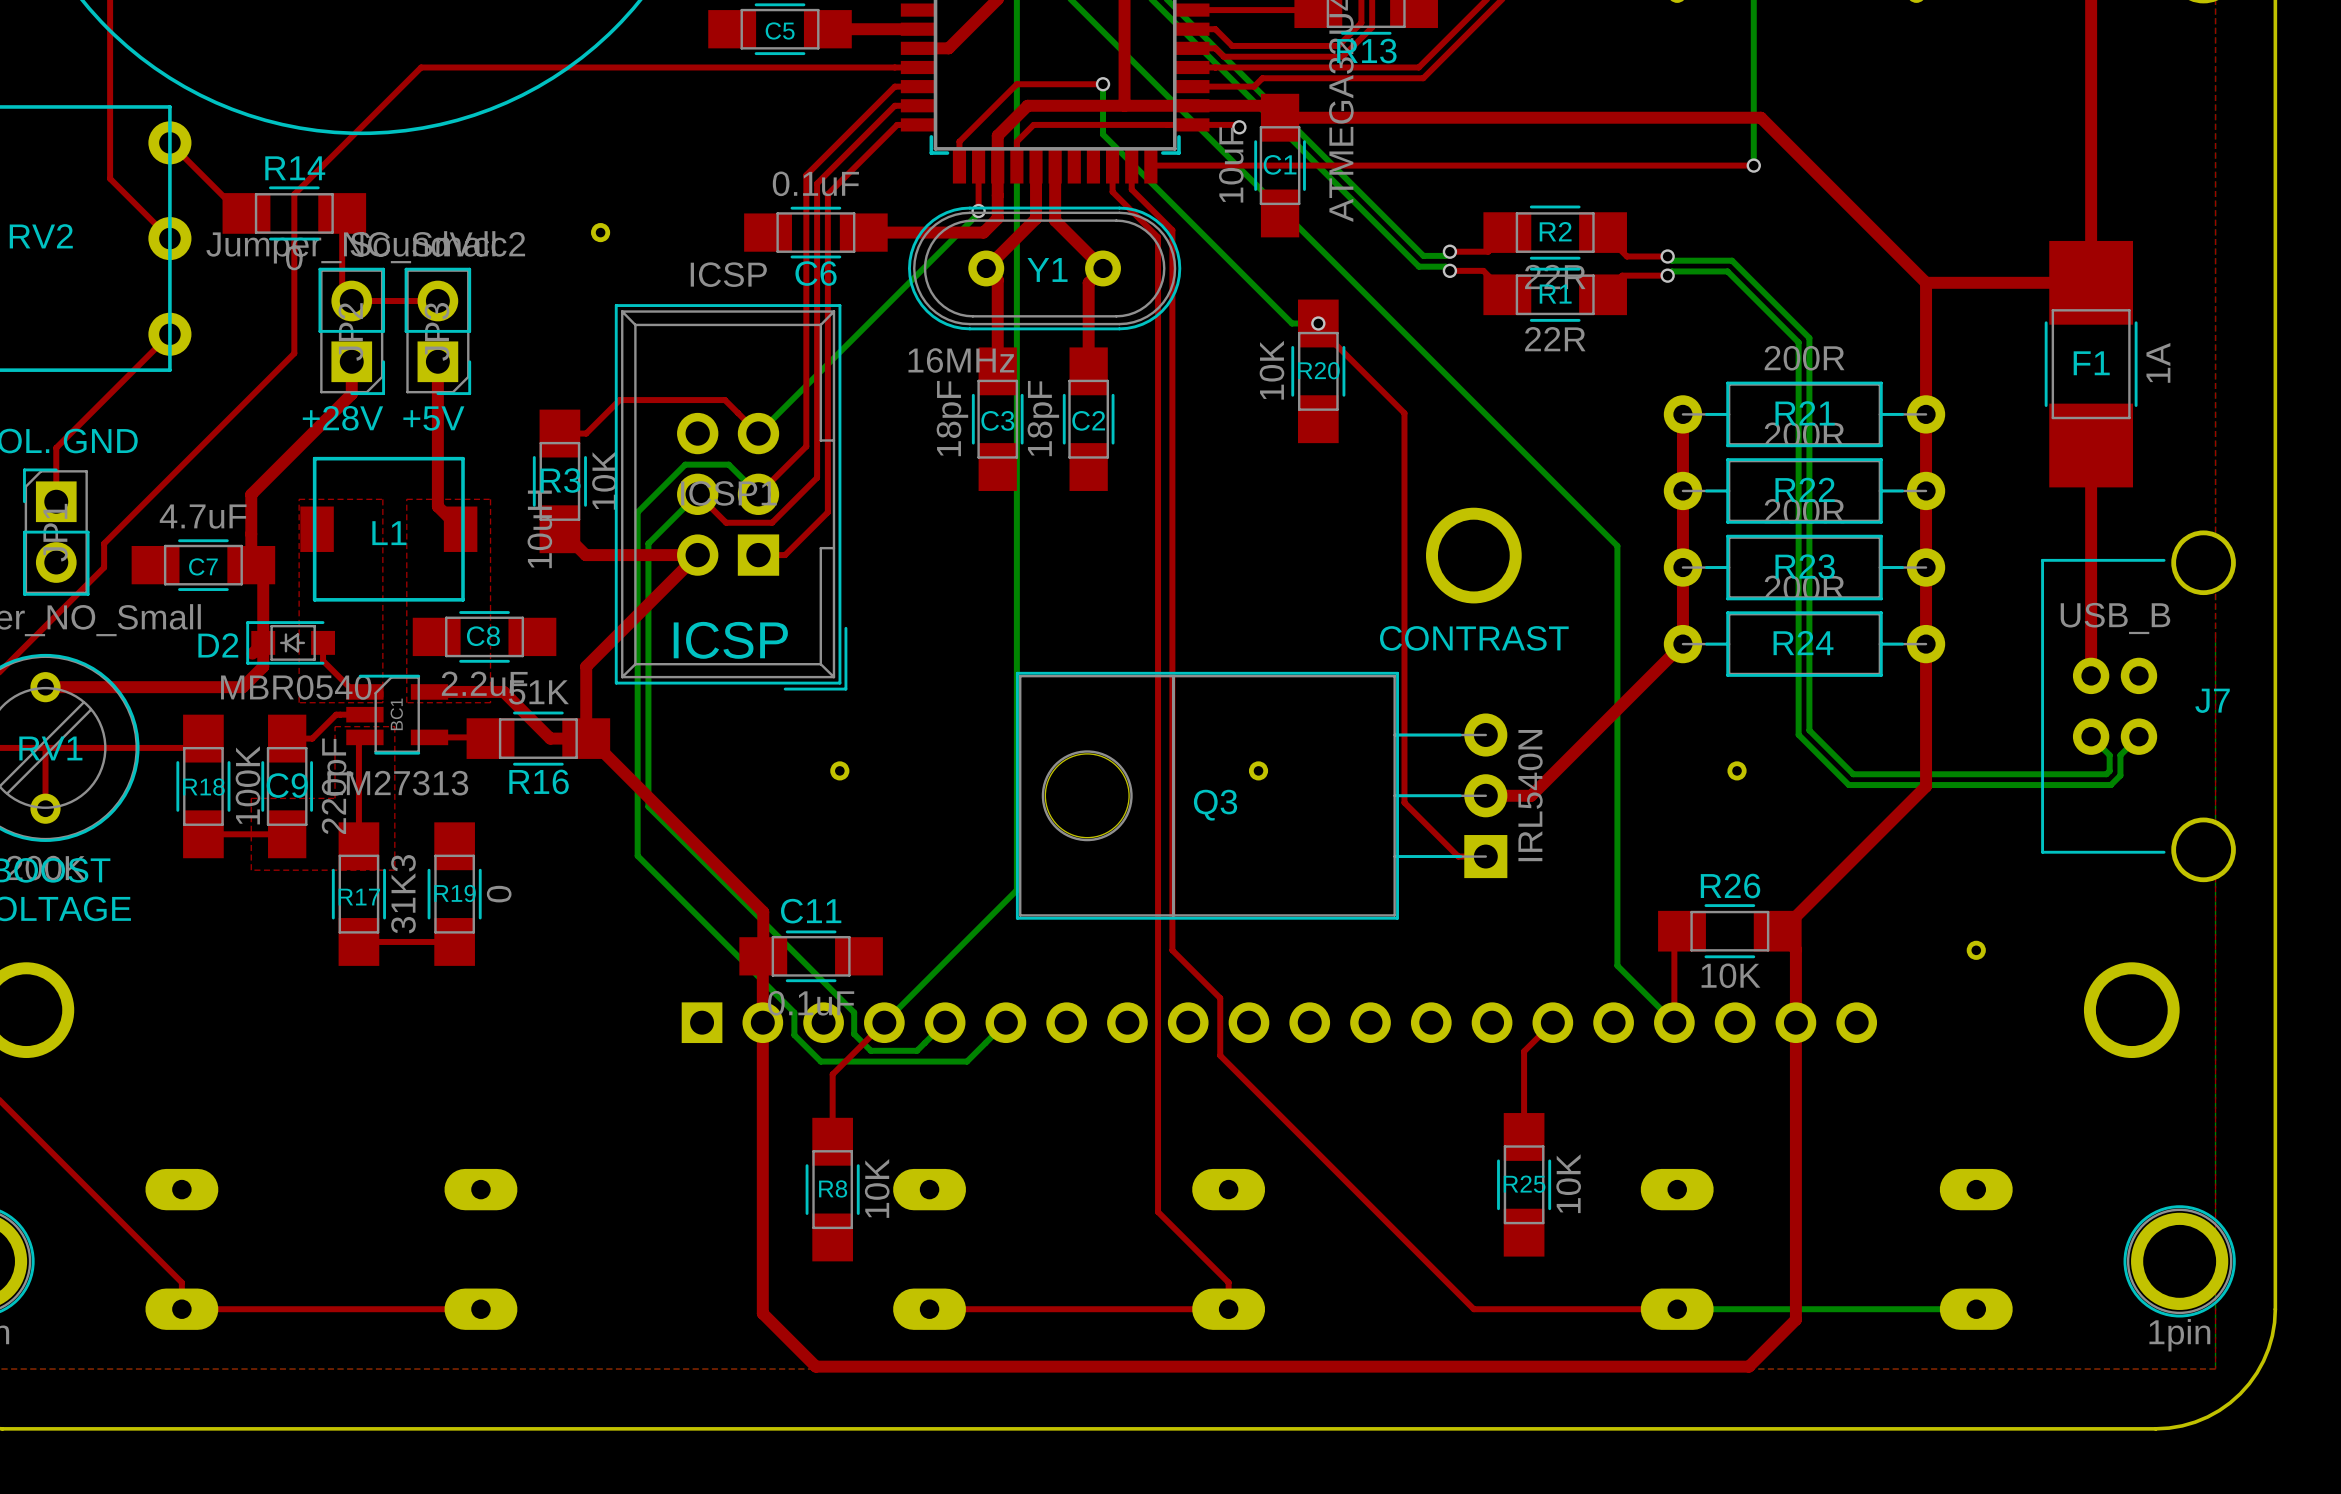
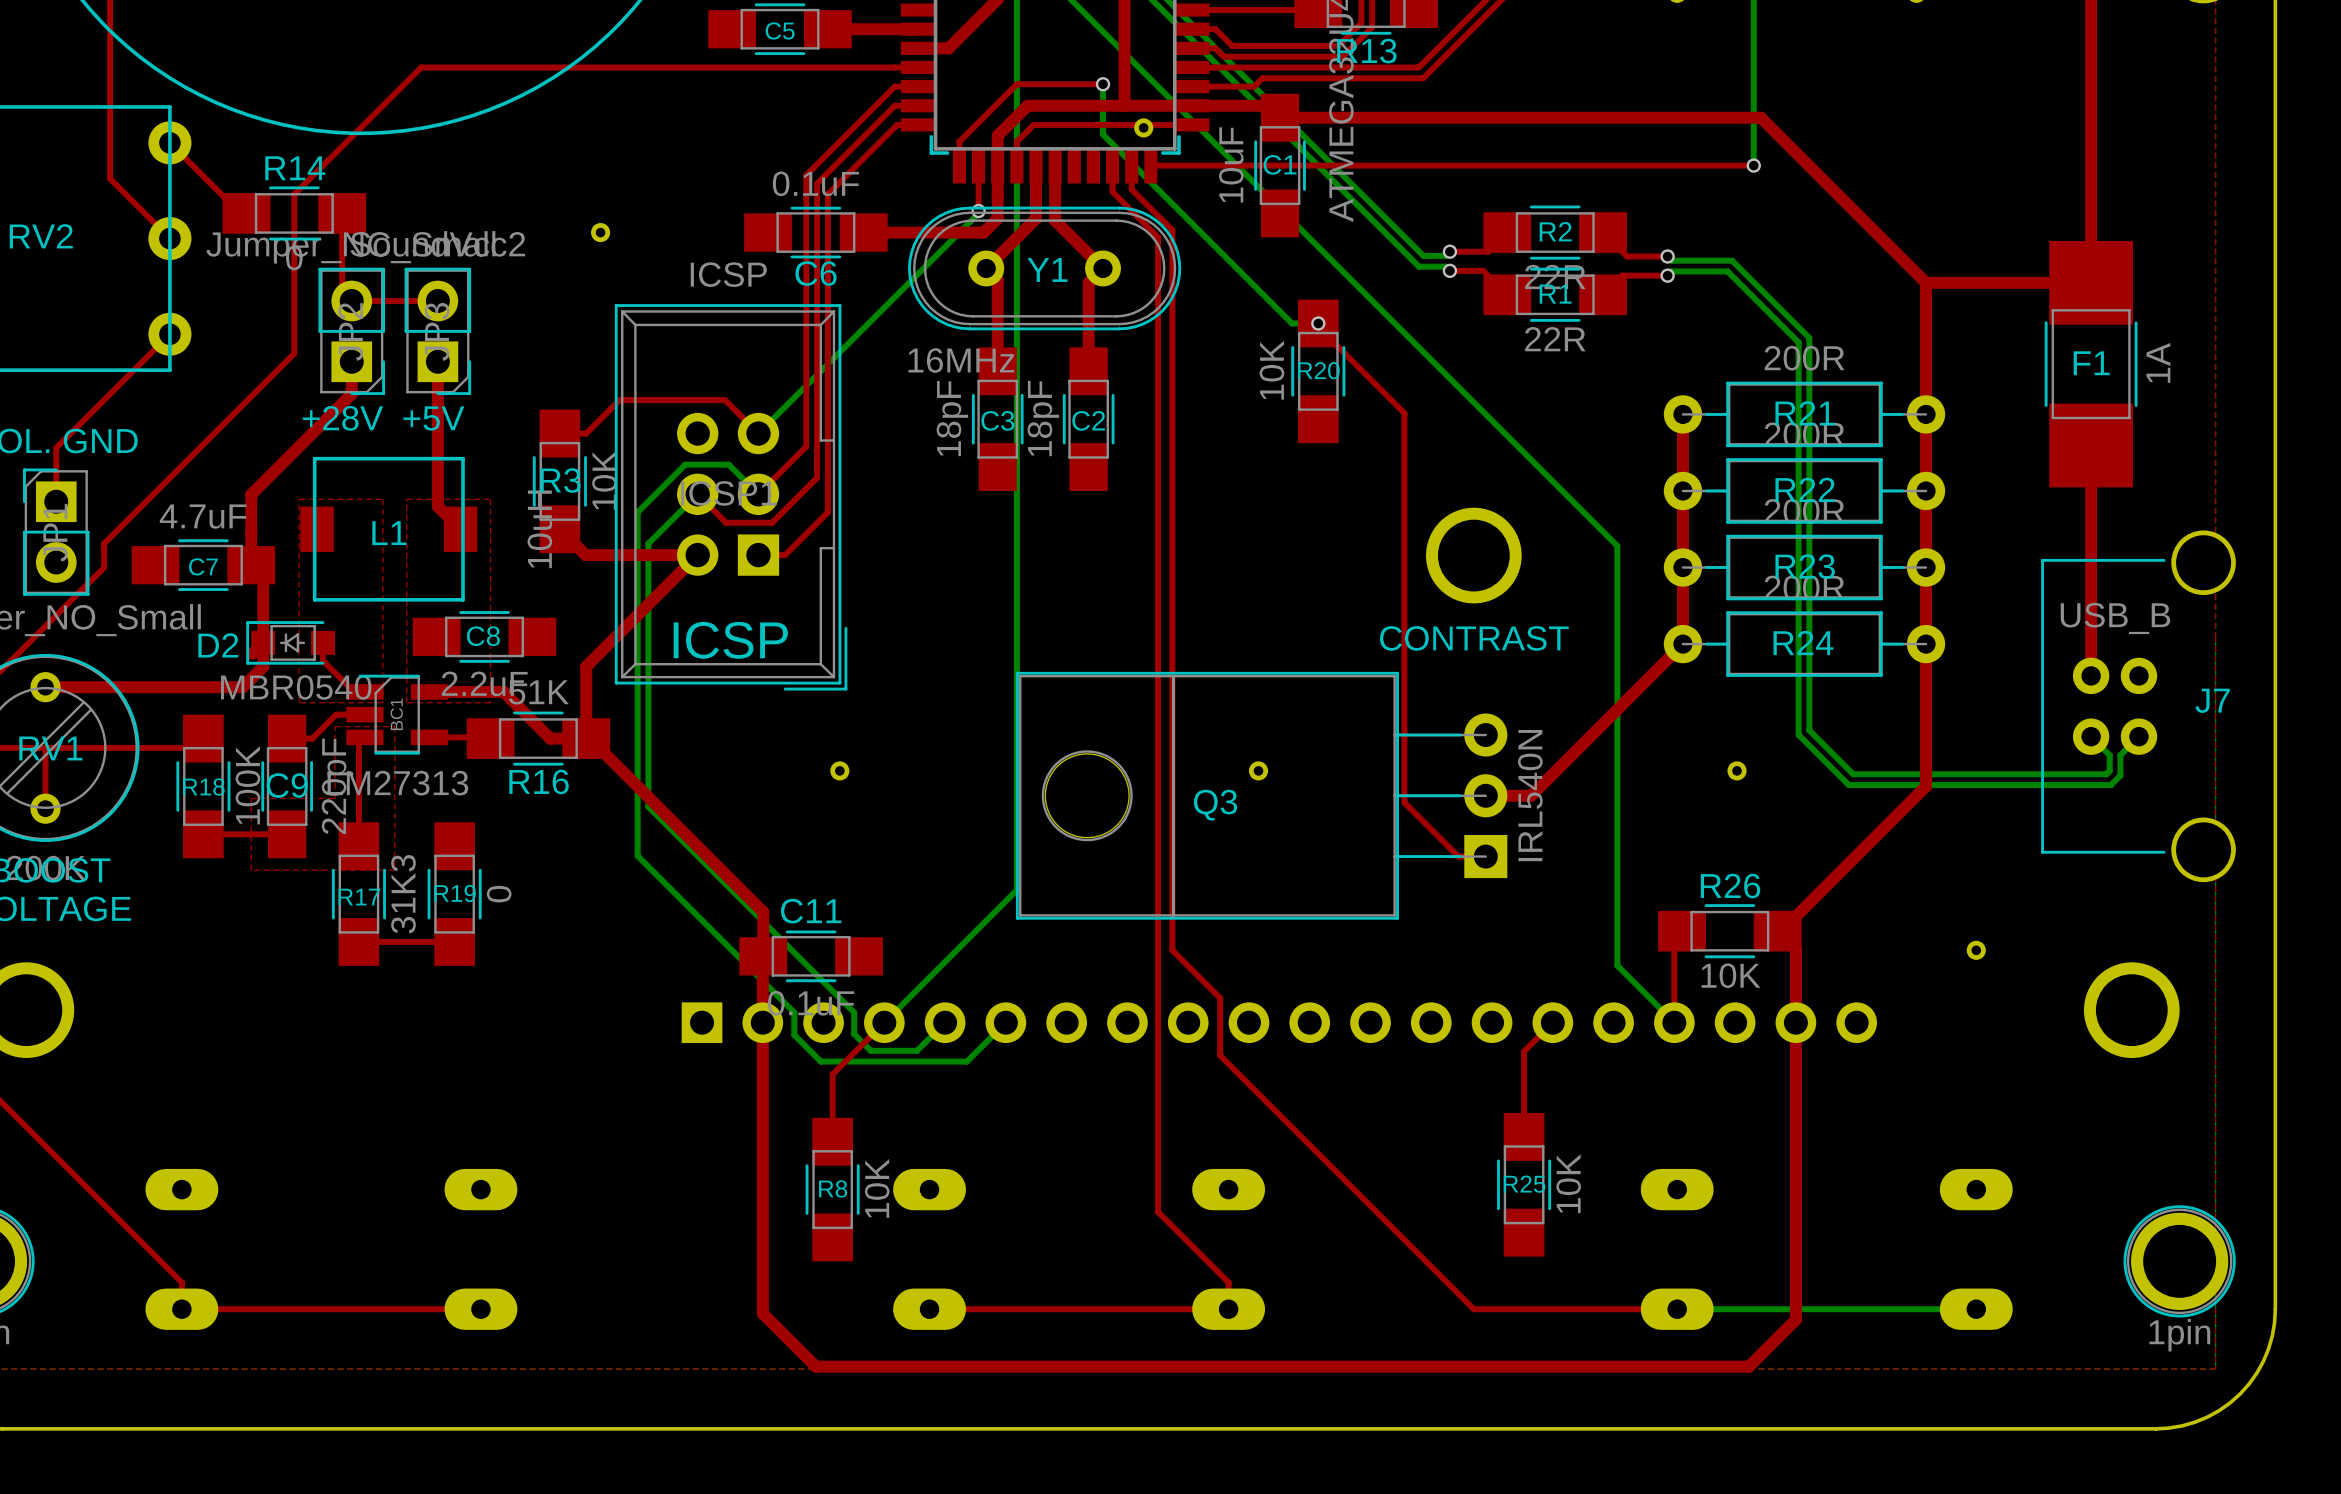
top track: (1191, 124) (1236, 124) (1239, 127) -> none
part: none -> (1143, 127)
via: (1239, 127) -> none

